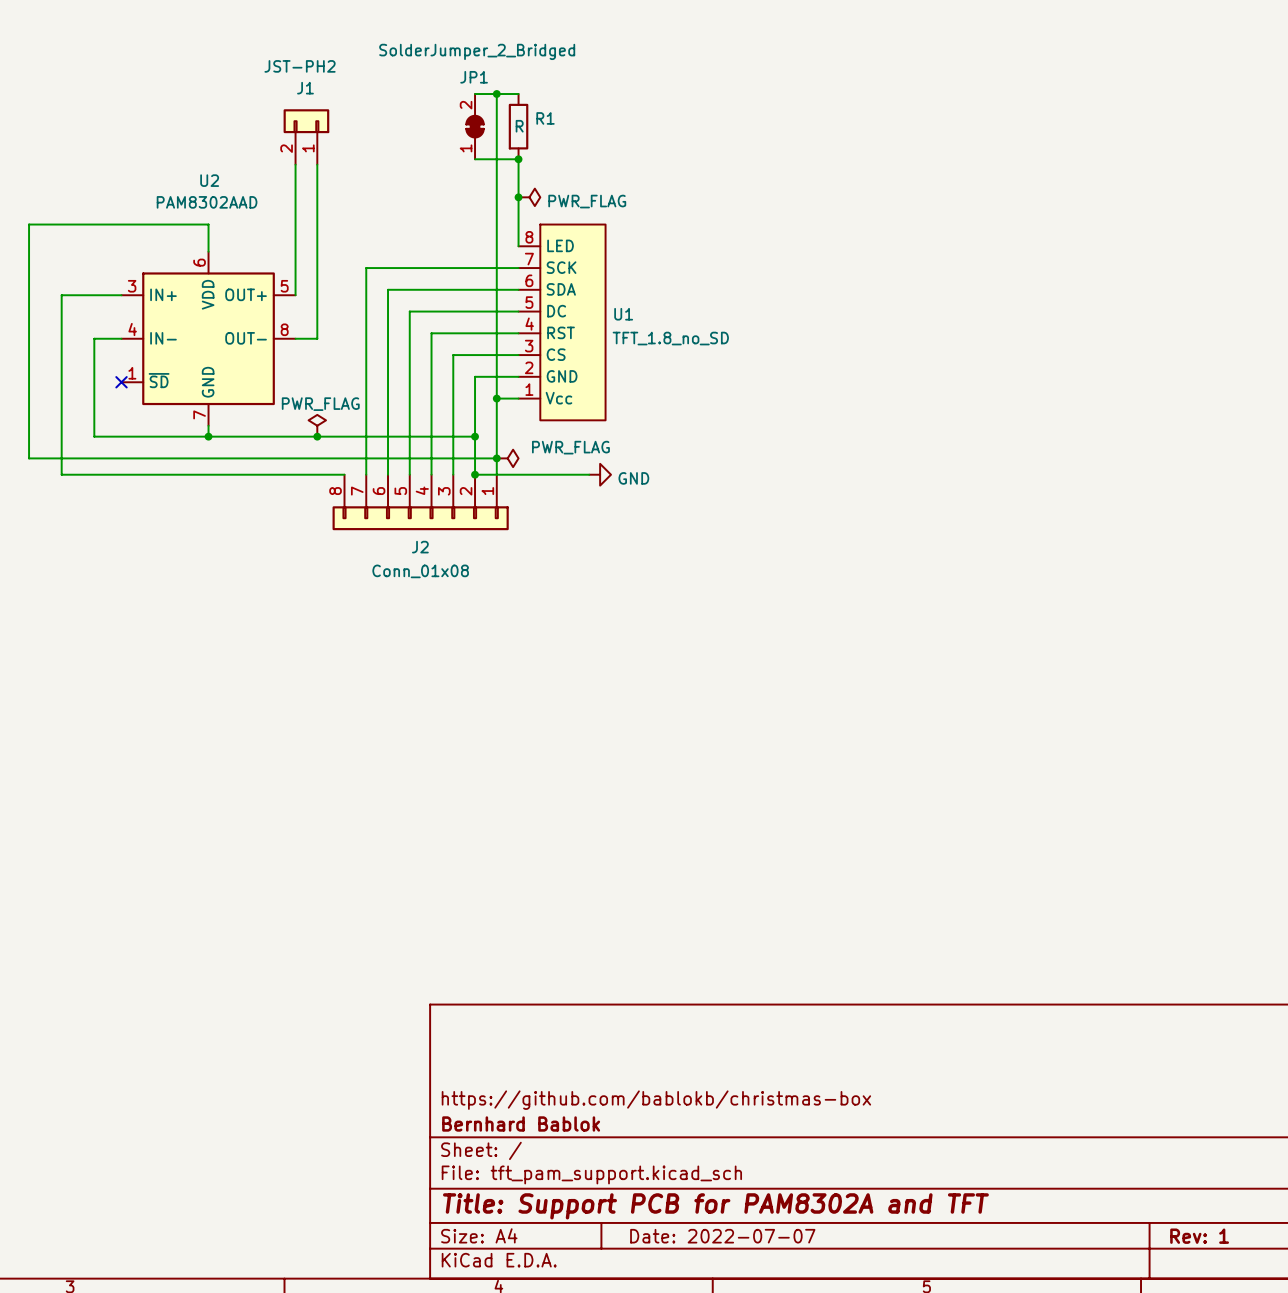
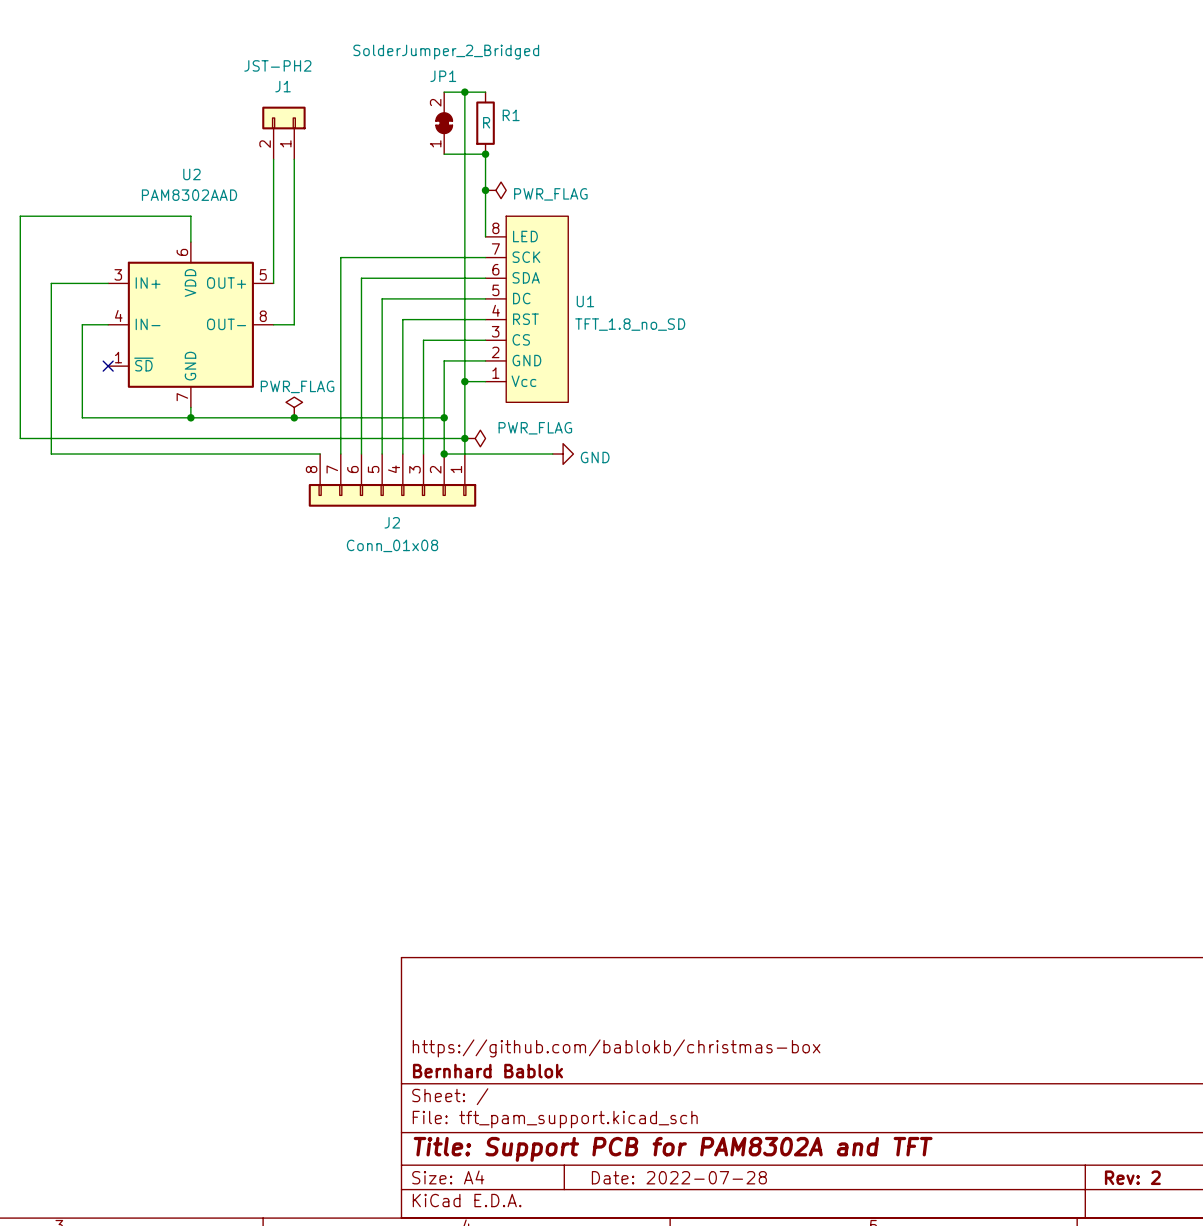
title block: Date: 2022-07-07 (722, 1236) -> Date: 2022-07-28 (679, 1177)
title block: Rev: 1 (1199, 1236) -> Rev: 2 (1132, 1177)

